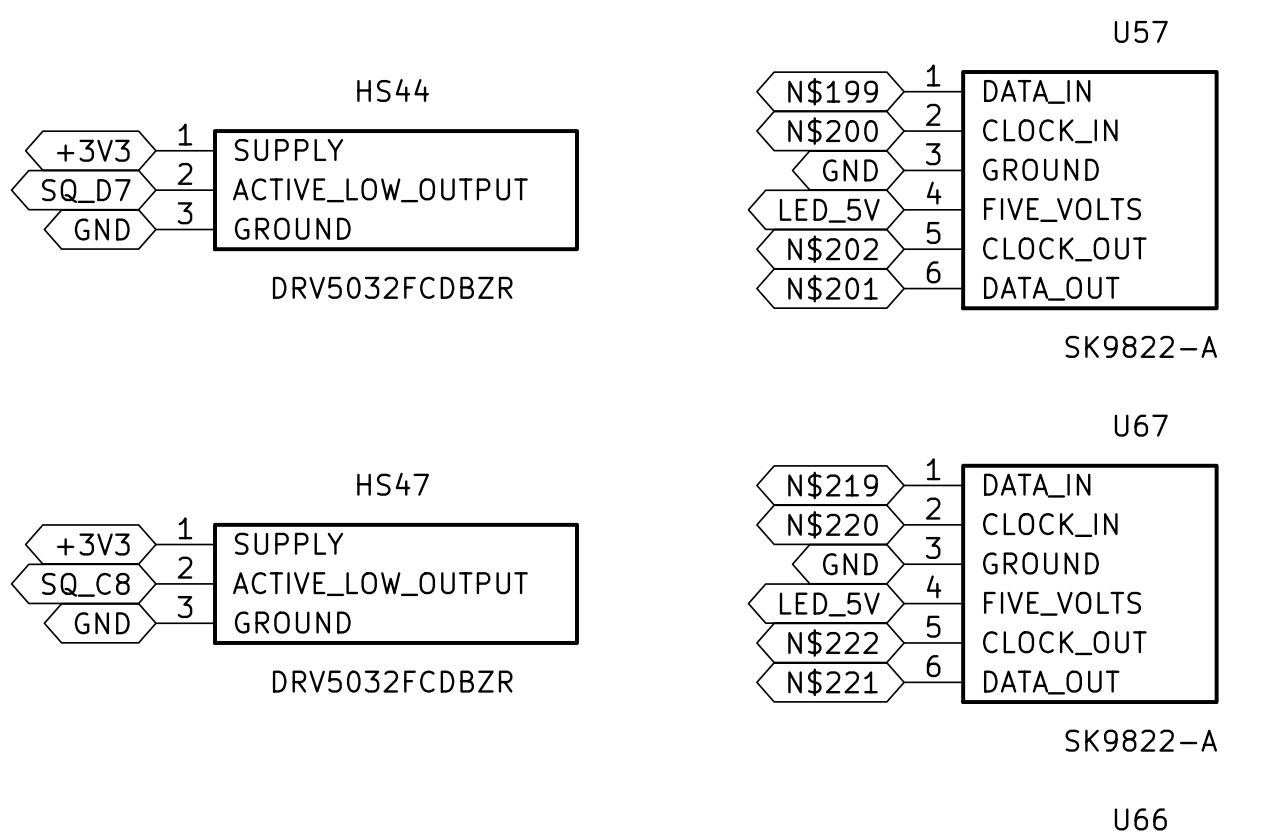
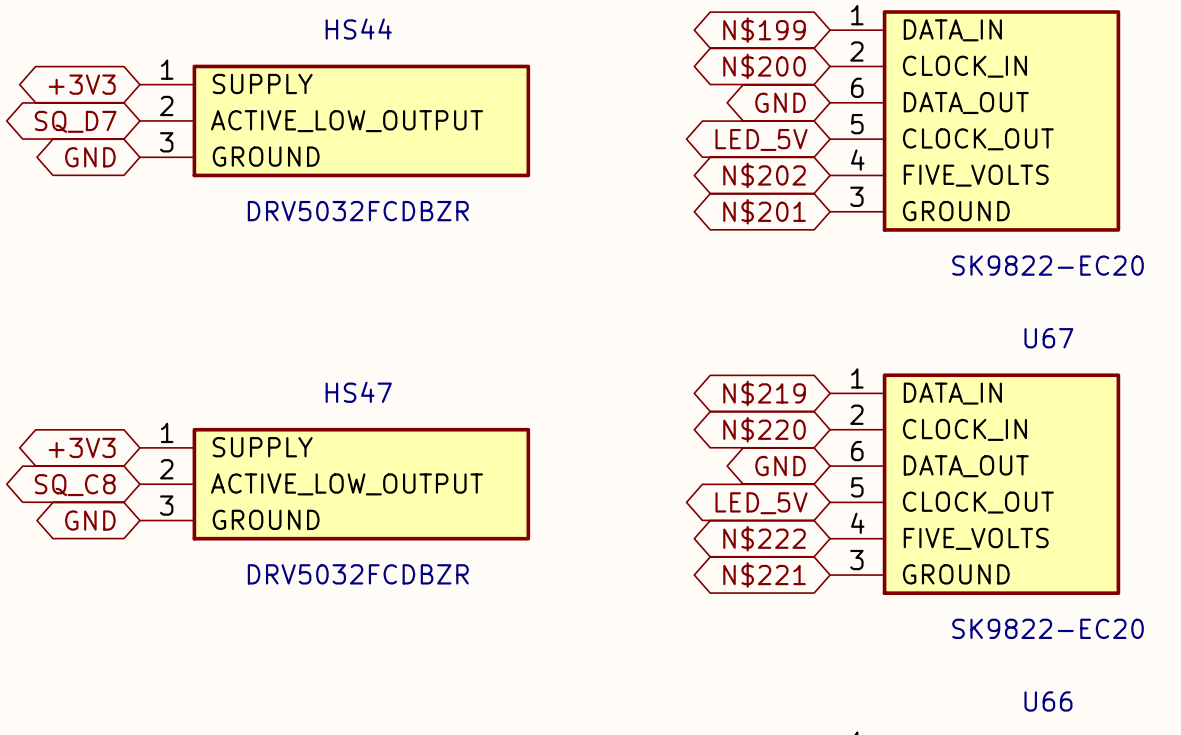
U57 pin number: 3 (933, 154) -> 6 (857, 87)
U57 pin name: GROUND (1040, 169) -> DATA_OUT (966, 102)
U57 pin number: 4 (934, 193) -> 5 (857, 124)
U57 pin name: FIVE_VOLTS (1062, 210) -> CLOCK_OUT (978, 139)
U57 pin number: 5 (933, 232) -> 4 (857, 160)
U57 pin name: CLOCK_OUT (1064, 249) -> FIVE_VOLTS (976, 175)
U57 pin number: 6 (933, 272) -> 3 (856, 196)
U57 pin name: DATA_OUT (1051, 288) -> GROUND (956, 211)
U57 value: SK9822-A (1141, 346) -> SK9822-EC20 (1048, 265)
U67 pin number: 3 (933, 547) -> 6 (857, 451)
U67 pin name: GROUND (1040, 563) -> DATA_OUT (966, 466)
U67 pin number: 4 (934, 586) -> 5 (857, 487)
U67 pin name: FIVE_VOLTS (1062, 603) -> CLOCK_OUT (978, 502)
U67 pin number: 5 (933, 626) -> 4 (857, 523)
U67 pin name: CLOCK_OUT (1064, 643) -> FIVE_VOLTS (976, 538)
U67 pin number: 6 (933, 666) -> 3 (856, 560)
U67 pin name: DATA_OUT (1051, 682) -> GROUND (956, 574)
U67 value: SK9822-A (1141, 740) -> SK9822-EC20 (1048, 628)

